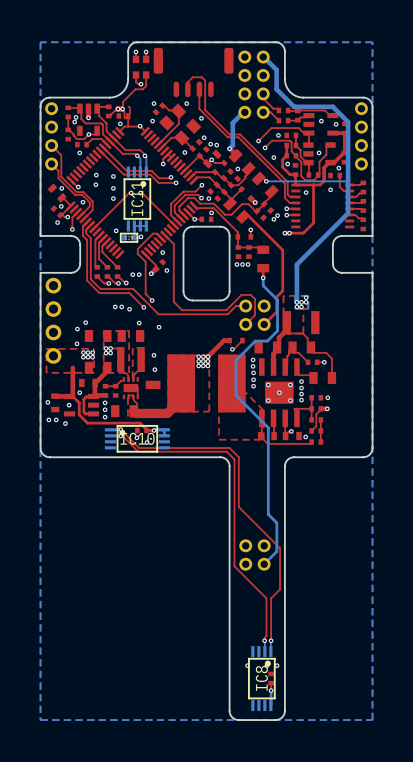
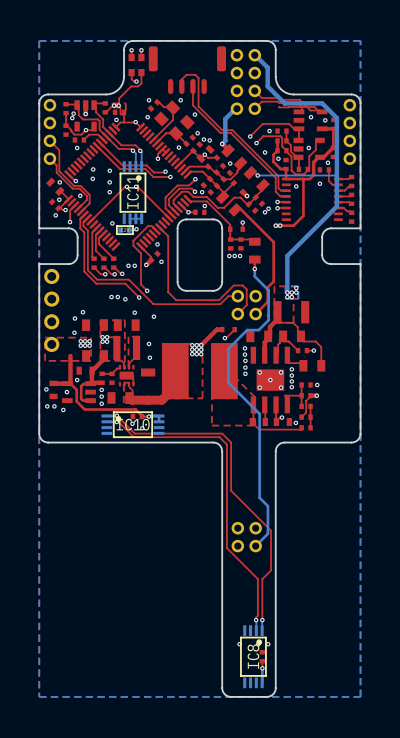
top track: (263, 93) (263, 98) (273, 108) (278, 108) (278, 110) -> (254, 90) (261, 98) (299, 99) (310, 110) (320, 111)
part: (283, 110) -> none
top track: (263, 112) (270, 112) (278, 120) -> (254, 108) (261, 101) (298, 102) (302, 106) (302, 111) (297, 111)
part: (297, 115) -> none
top track: (308, 115) (300, 117) (297, 120) (288, 120) -> none
part: (283, 120) -> none

